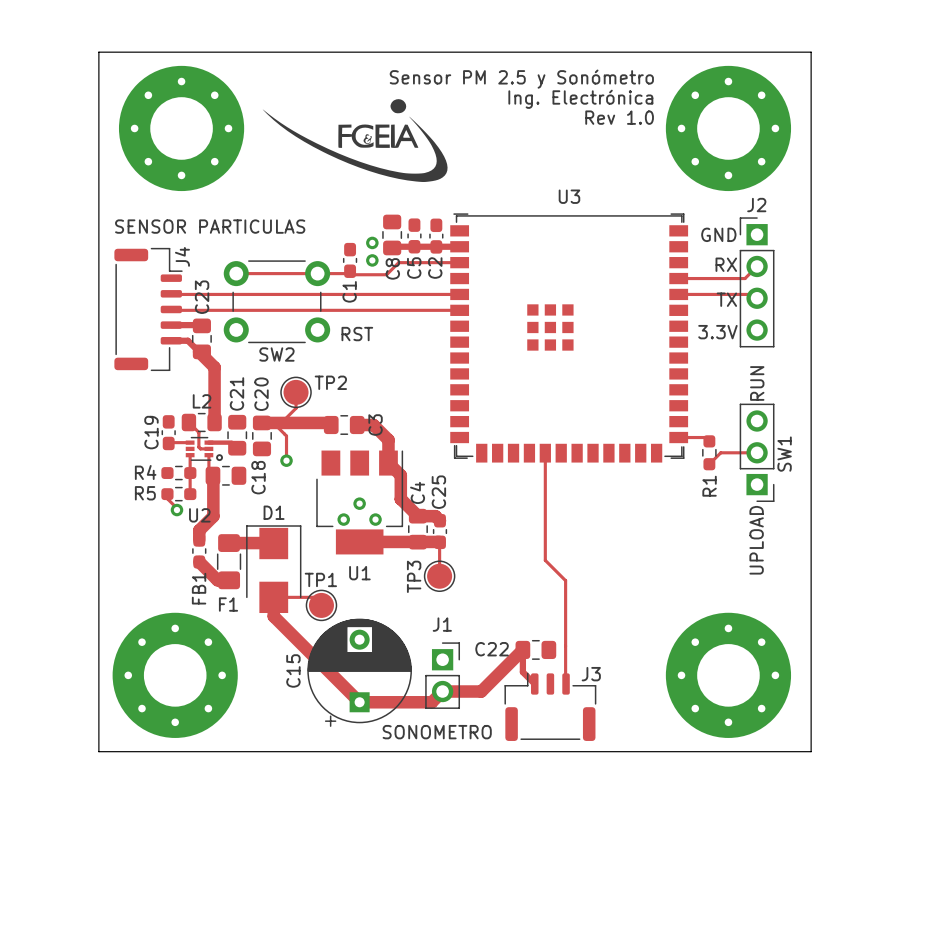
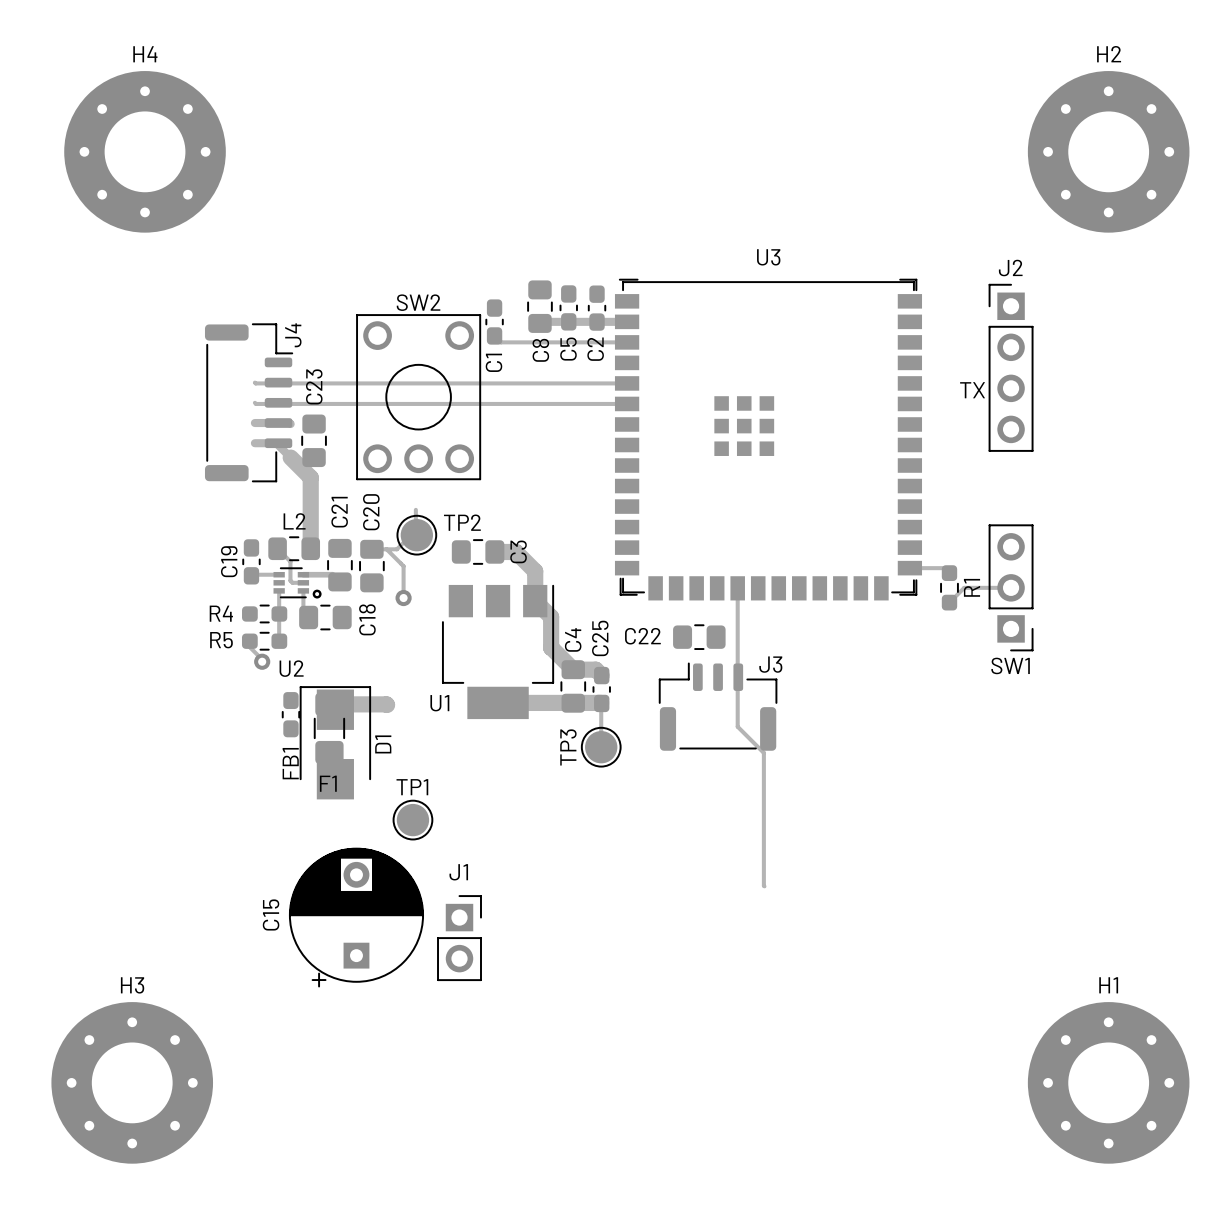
board edge: (98, 52) (811, 52) (811, 751) (98, 751) (98, 52) -> none
text: Sensor PM 2.5 y Sonómetro (521, 79) -> none
drawing: [262, 99, 448, 182] -> none
text: Ing. Electrónica (580, 99) -> none
H4: none -> (145, 151)
H2: none -> (1108, 151)
text: Rev 1.0 (619, 117) -> none
part: (181, 128) -> none
part: (728, 128) -> none
text: SENSOR PARTICULAS (210, 226) -> none
text: GND (718, 234) -> none
via: (372, 242) -> none
SW2 footprint: [223, 260, 331, 344] -> [356, 314, 482, 481]
C1 position: (350, 260) -> (494, 322)
via: (372, 260) -> none
track: (398, 262) (386, 274) (353, 274) (350, 271) (347, 273) (236, 273) -> (548, 342) (500, 342) (494, 335)
text: RX (726, 264) -> none
track: (757, 266) (745, 278) (678, 278) -> none
track: (678, 294) (753, 294) (757, 298) -> none
J4 position: (148, 309) -> (249, 402)
text: 3.3V (717, 332) -> none
text: RST (357, 334) -> none
C23 position: (201, 338) -> (314, 440)
SW2 name position: SW2 (276, 354) -> SW2 (418, 302)
text: RUN (757, 383) -> none
TP2 position: (296, 392) -> (416, 535)
track: (261, 422) (329, 422) (331, 425) -> none
SW1 name rotation: 0° (784, 454) -> 90° clockwise (1010, 665)
SW1 name position: SW1 (784, 454) -> SW1 (1010, 665)
track: (212, 475) (213, 516) (199, 530) (199, 540) -> none
R1 name position: R1 (709, 486) -> R1 (971, 587)
via: (359, 503) -> none
D1 name rotation: 0° (274, 512) -> 90° counterclockwise (383, 744)
D1 name position: D1 (274, 512) -> D1 (383, 744)
via: (343, 519) -> none
via: (375, 519) -> none
text: UPLOAD (756, 540) -> none
track: (199, 561) (217, 580) (229, 580) -> none
D1 position: (273, 569) -> (335, 742)
U1 name position: U1 (359, 573) -> U1 (439, 703)
track: (321, 605) (313, 597) (273, 597) (273, 616) (359, 702) (431, 702) (442, 691) (481, 691) (522, 649) (522, 672) (534, 684) -> none
TP1 position: (321, 605) -> (412, 820)
C22 position: (535, 649) -> (699, 637)
C15 position: (359, 672) -> (356, 917)
part: (175, 675) -> none
J1 position: (442, 675) -> (459, 938)
part: (728, 675) -> none
J3 position: (550, 706) -> (718, 706)
text: SONOMETRO (437, 732) -> none
H3: none -> (132, 1082)
H1: none -> (1108, 1082)

